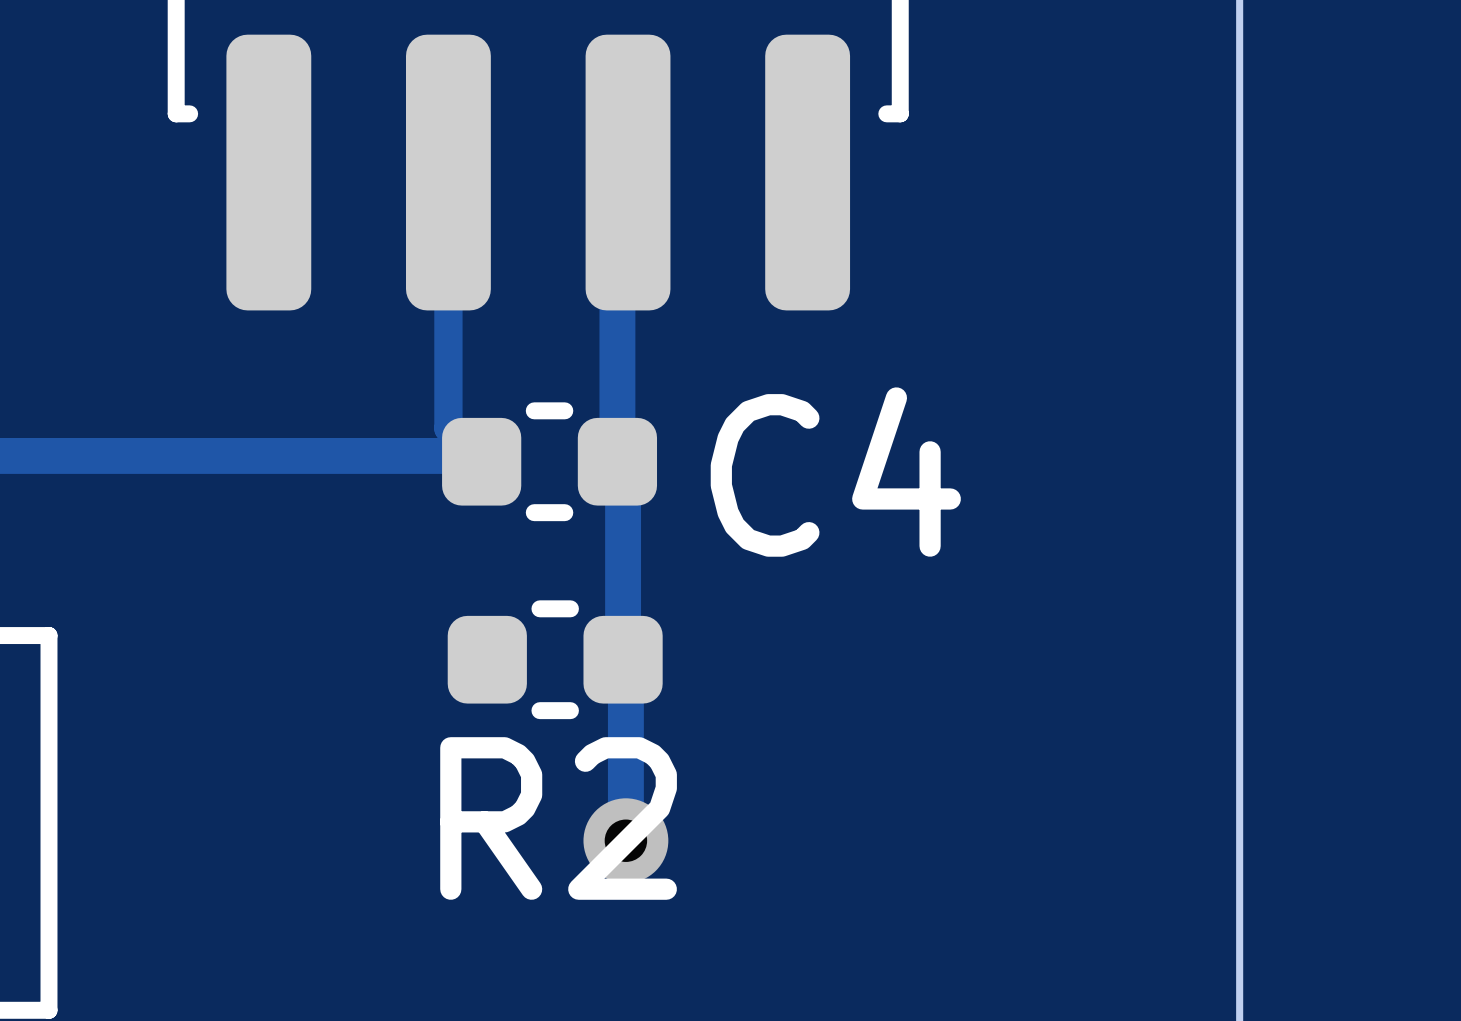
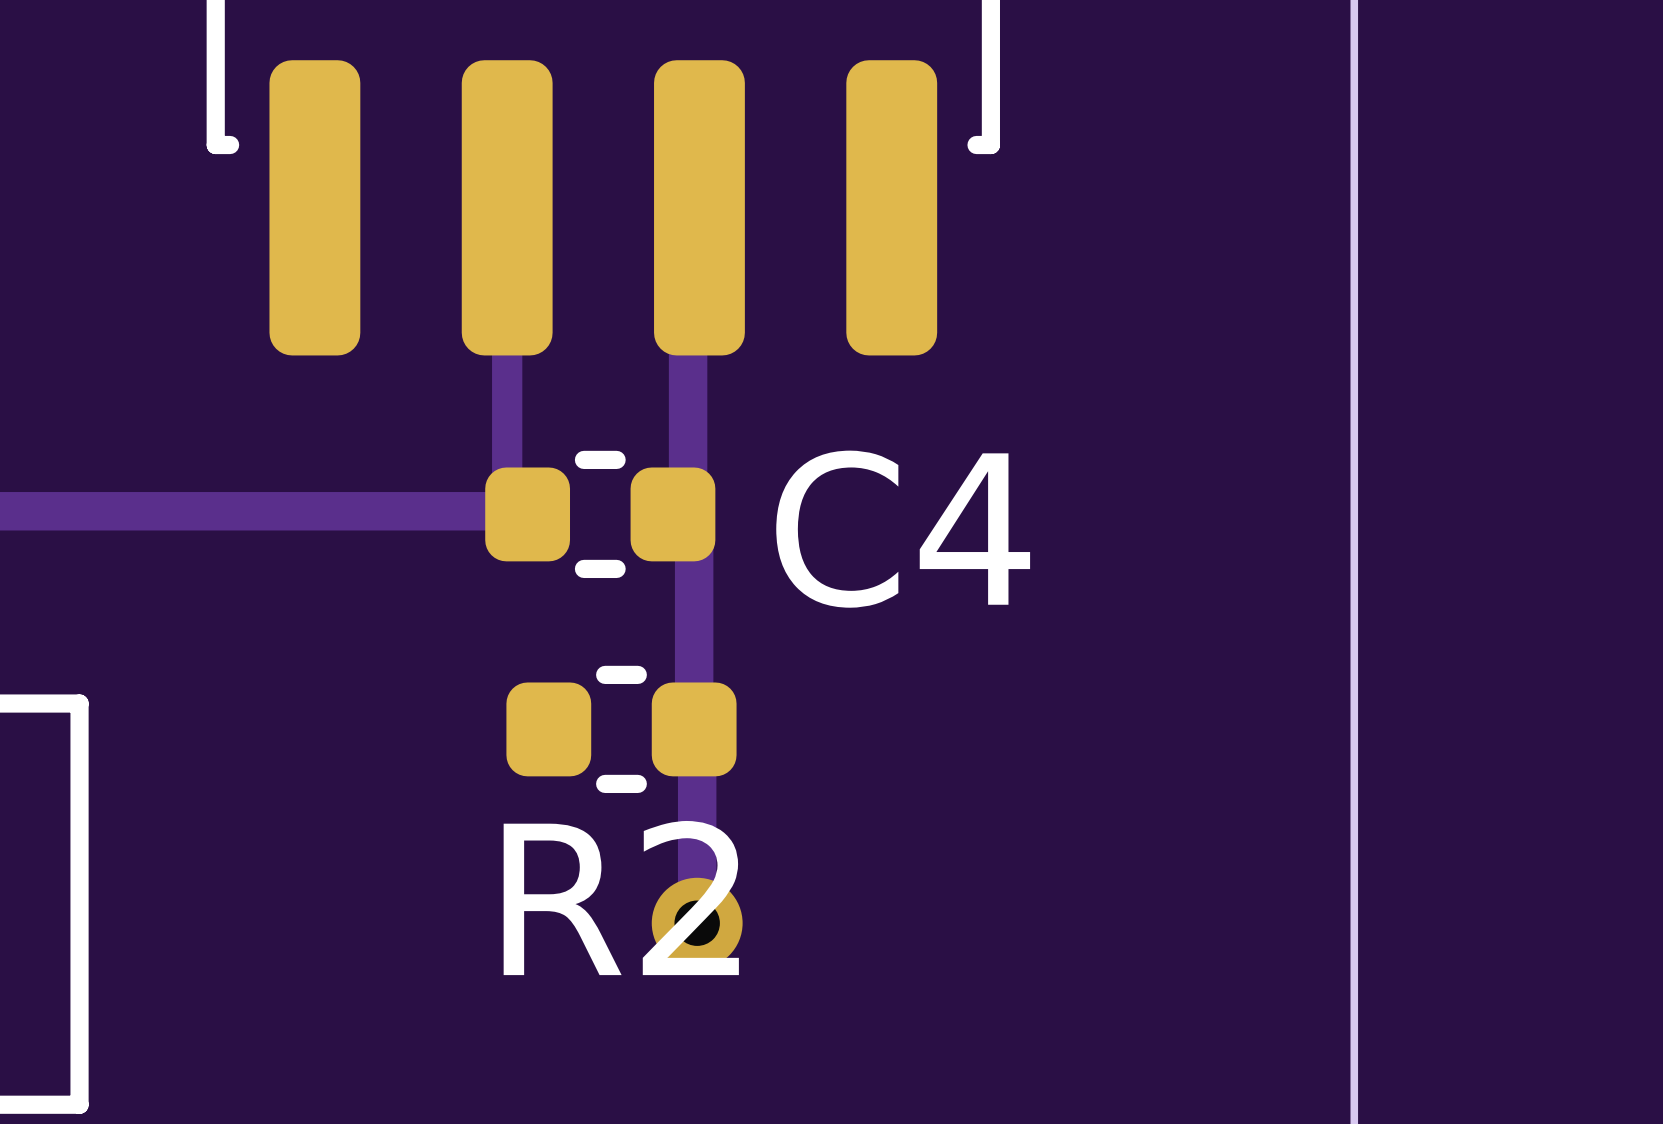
C4 position: (549, 461) -> (600, 514)

